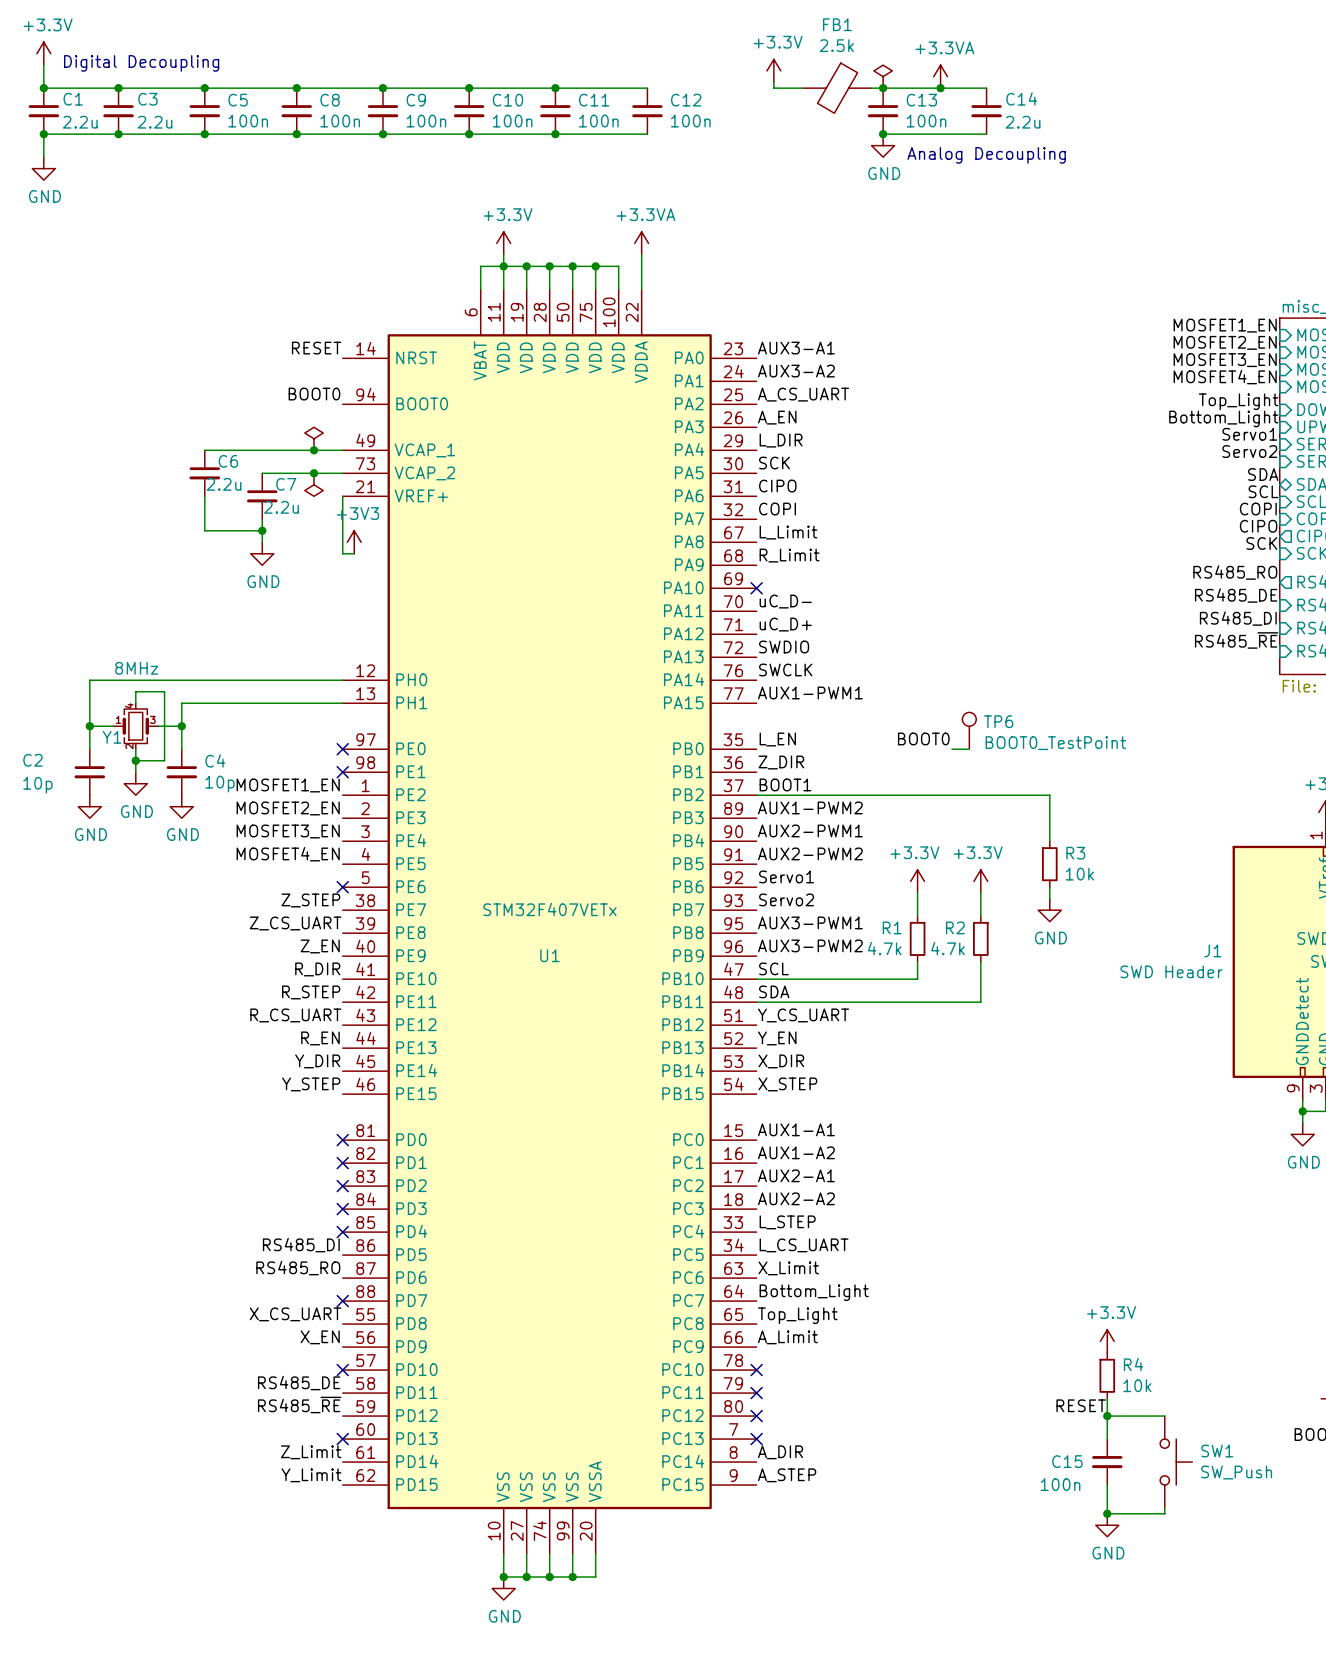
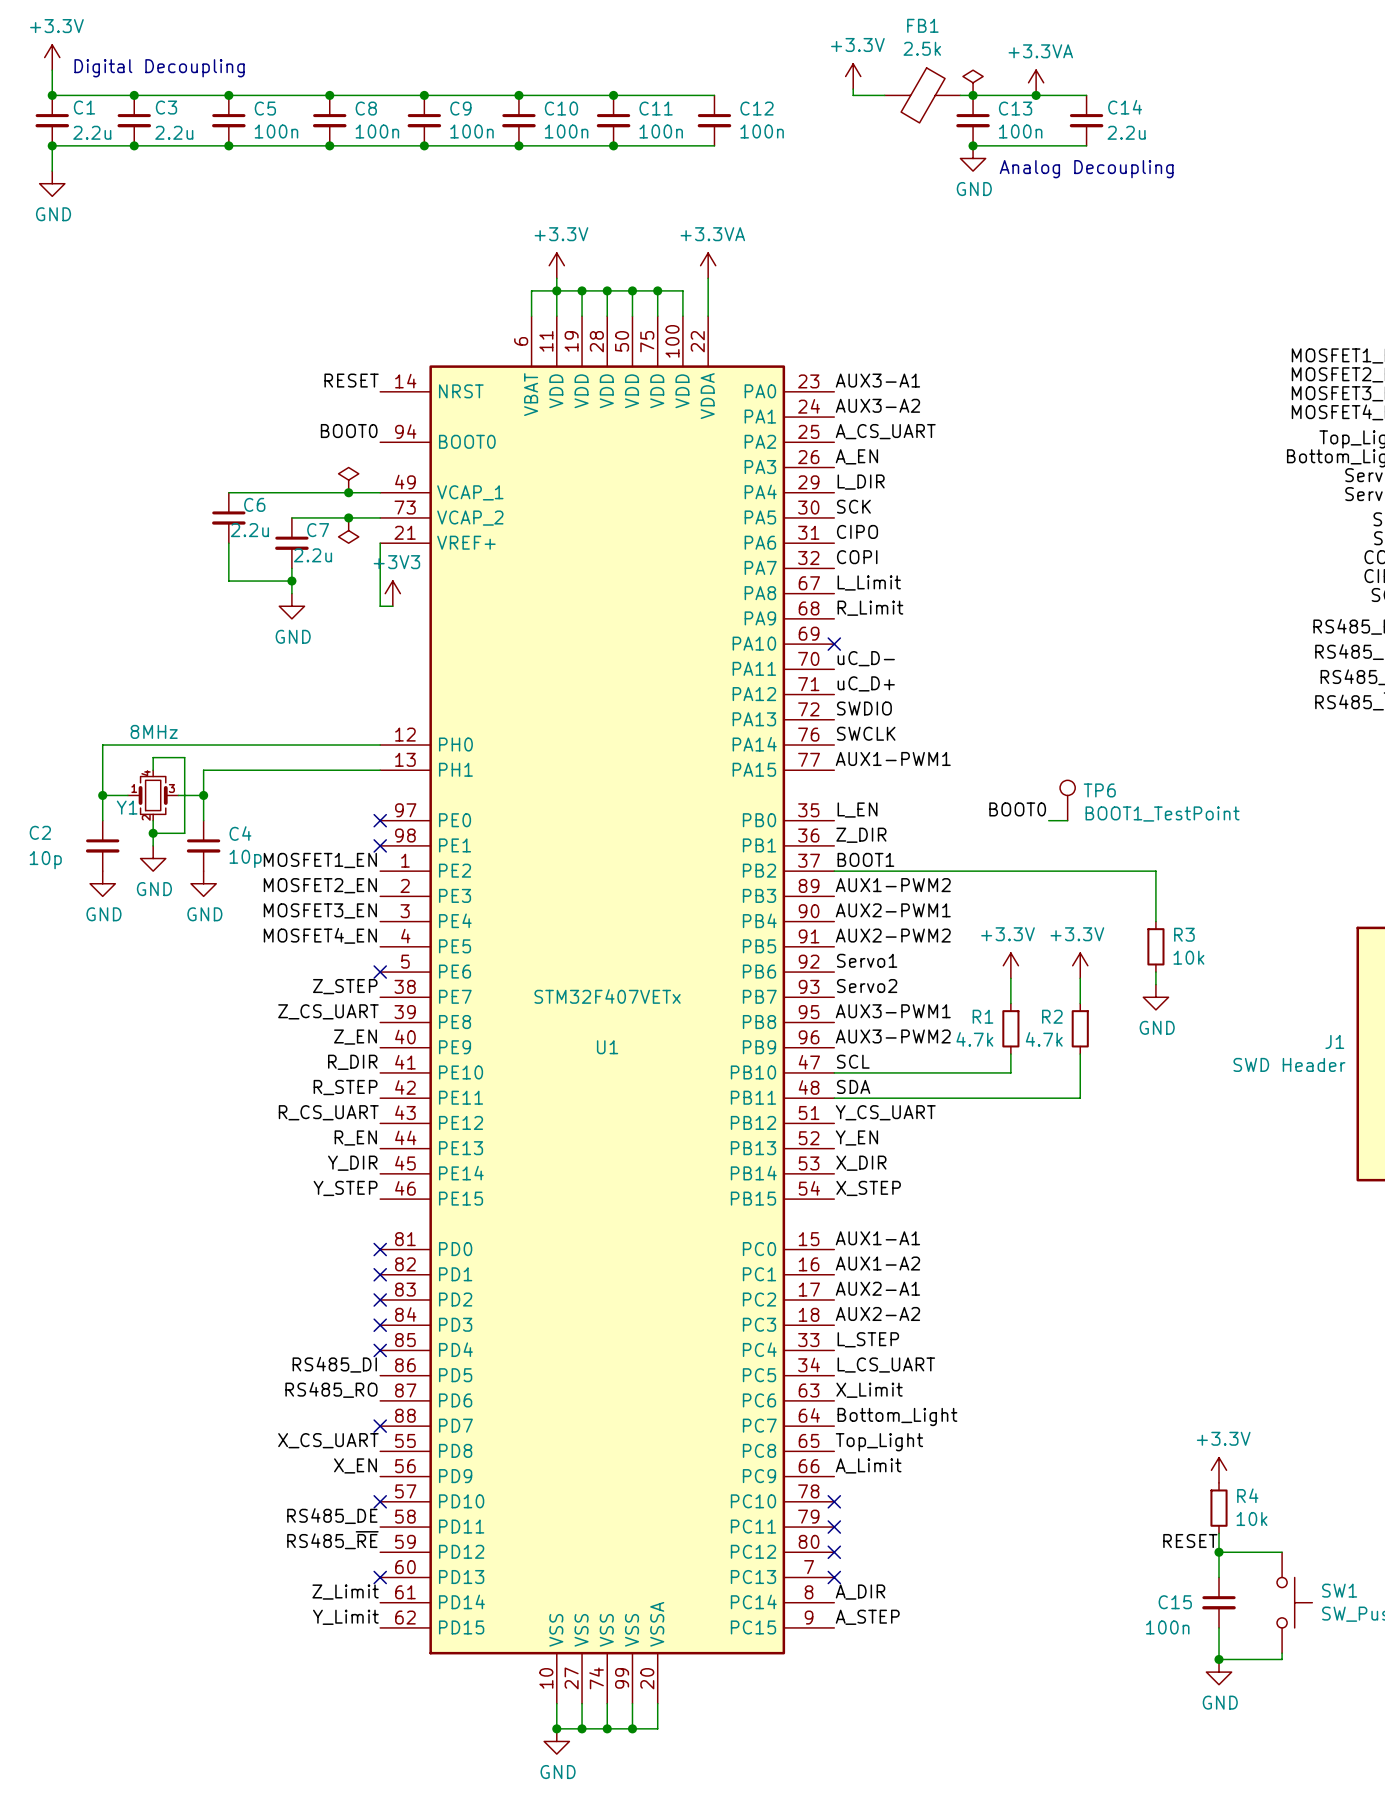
TP6 value: BOOT0_TestPoint (1055, 743) -> BOOT1_TestPoint (1162, 814)

